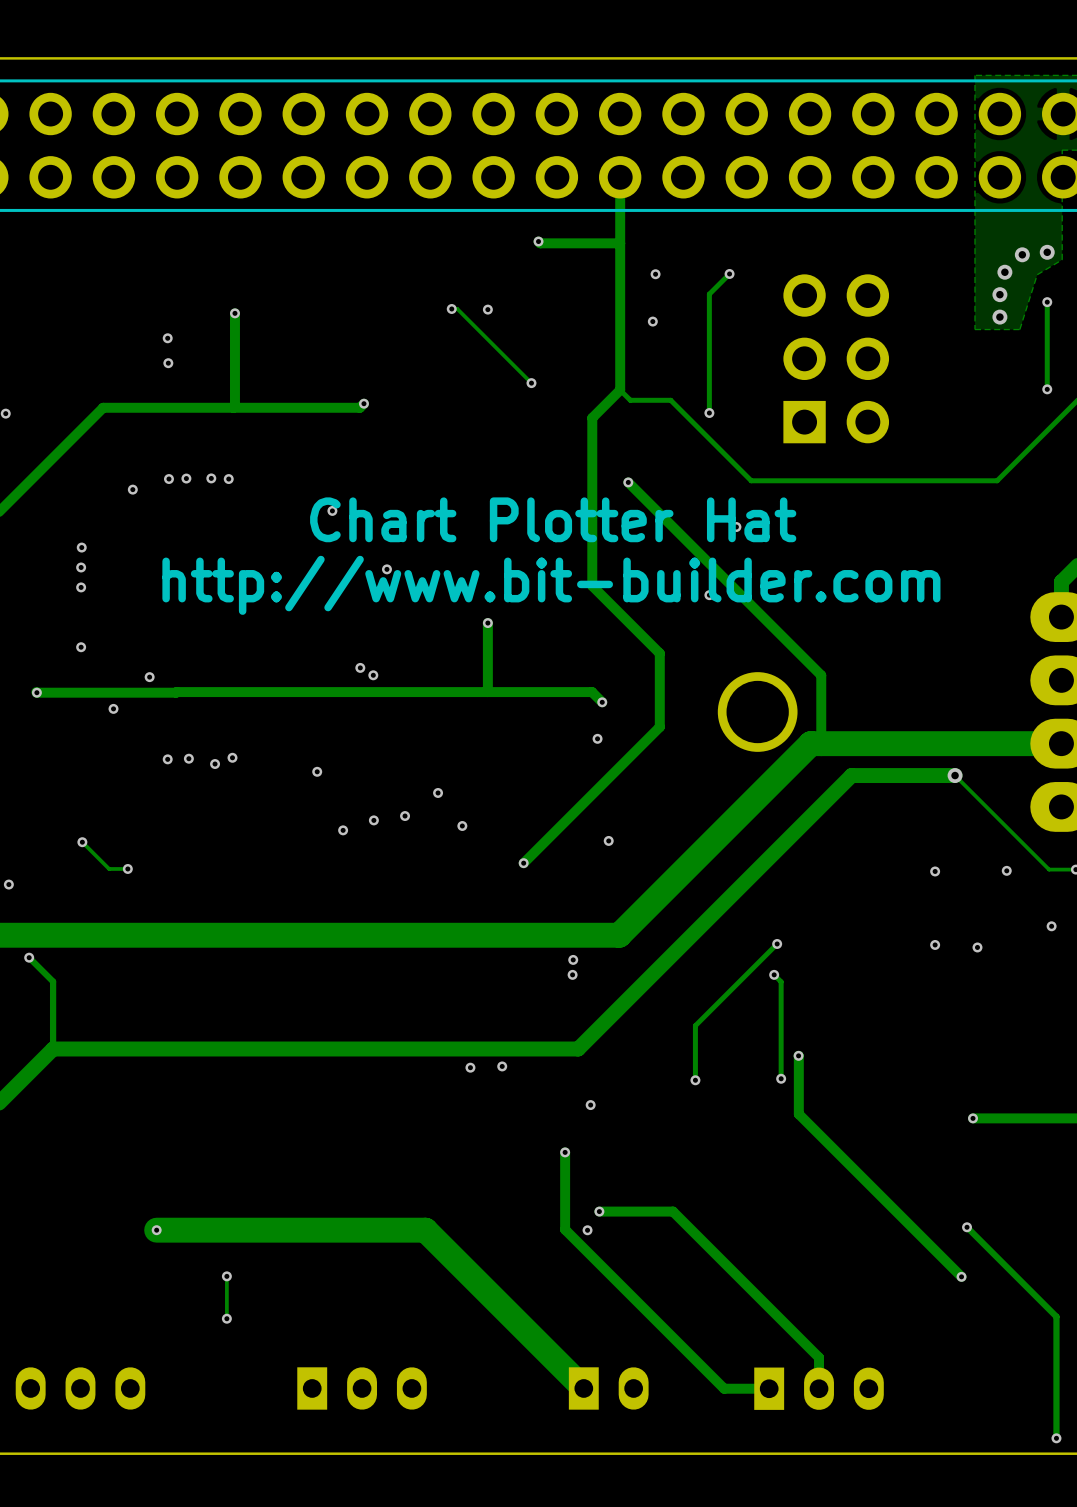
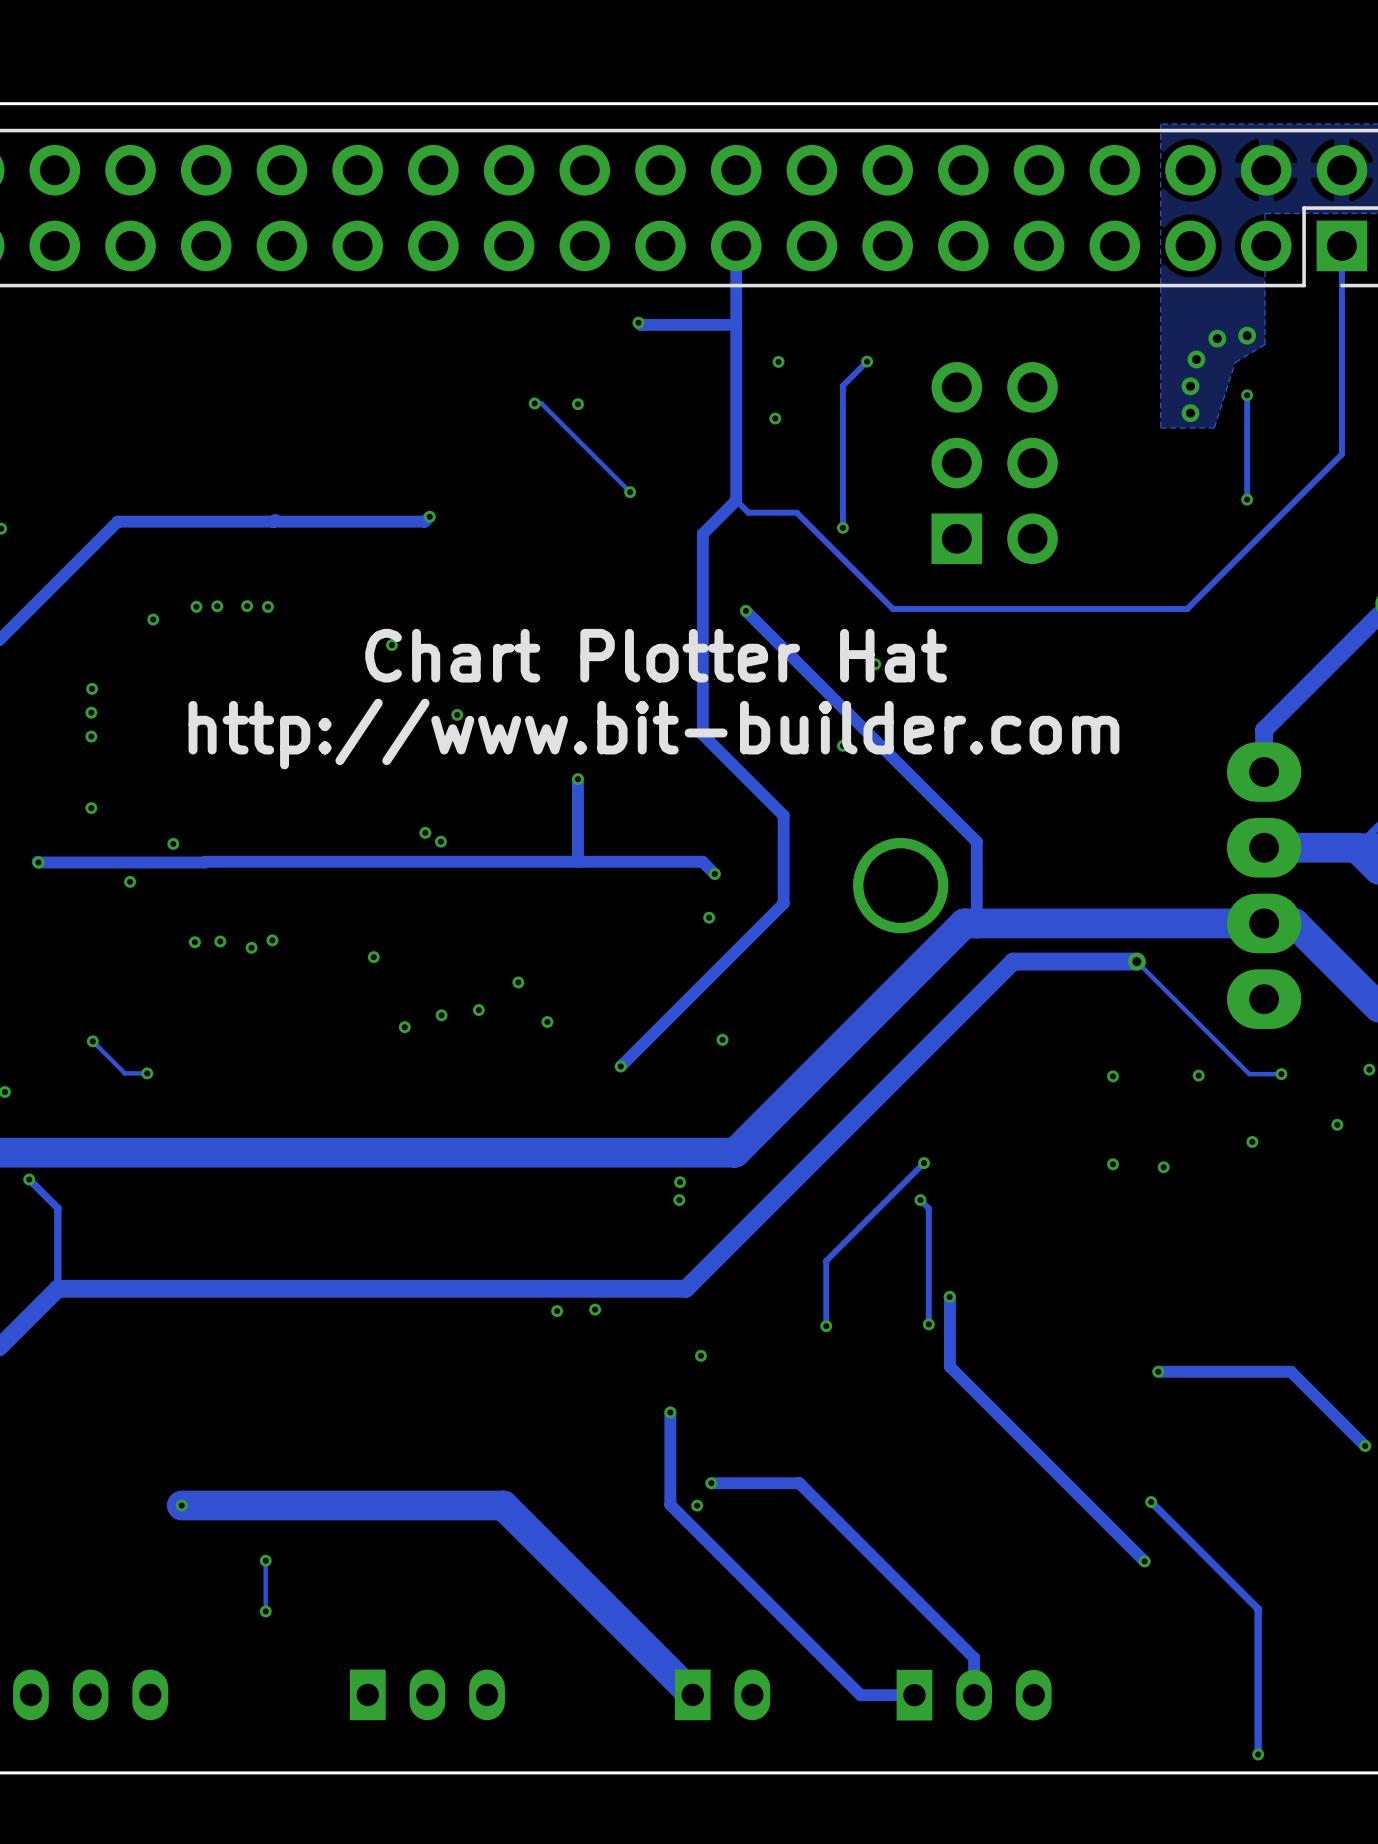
track: (234, 313) (234, 406) -> none
via: (234, 313) -> none
via: (167, 338) -> none
via: (168, 363) -> none

